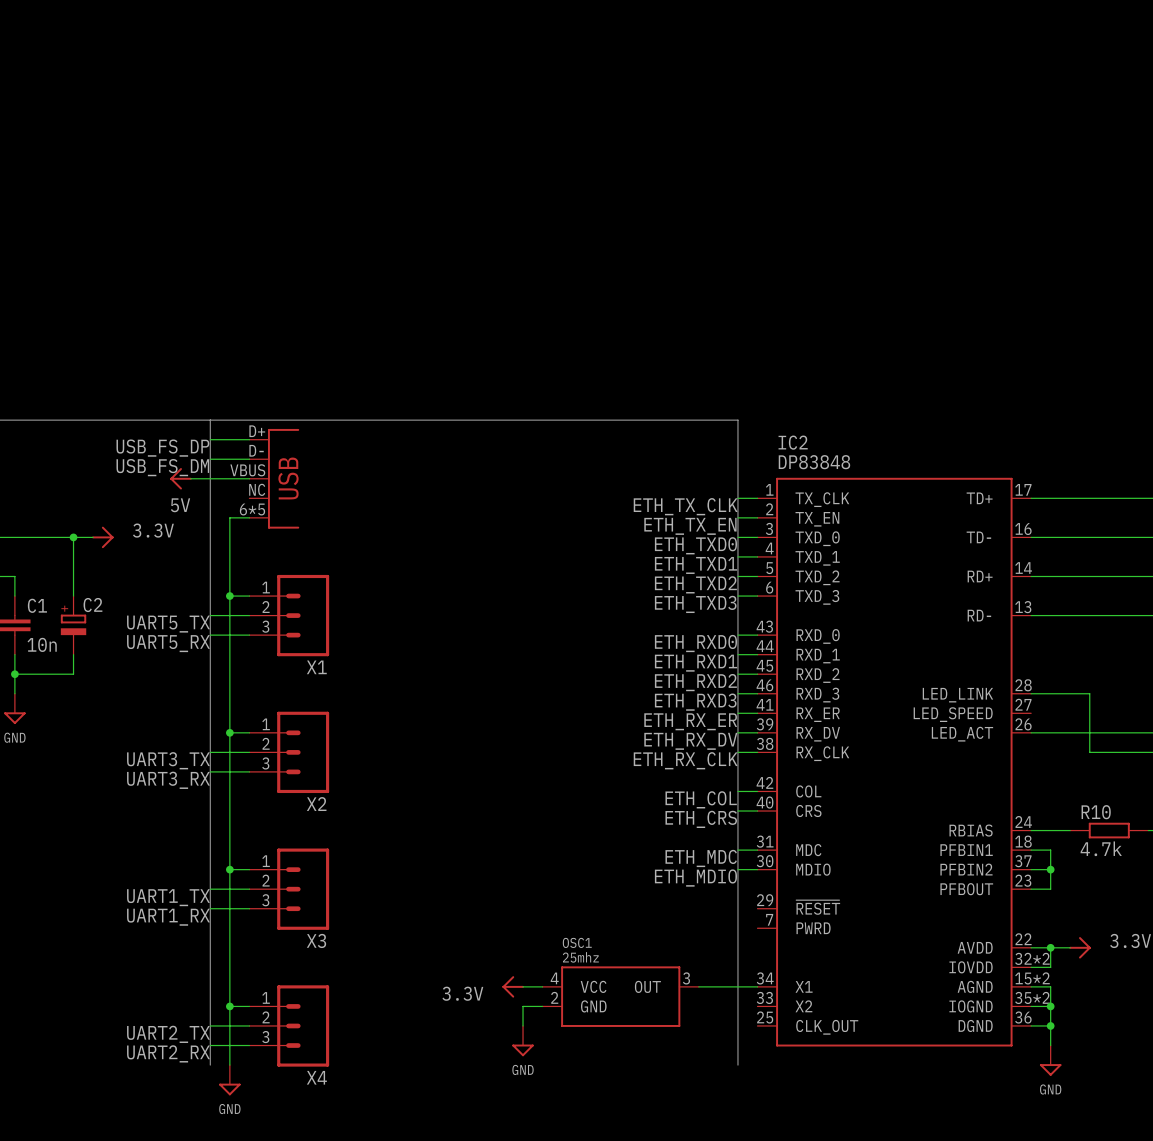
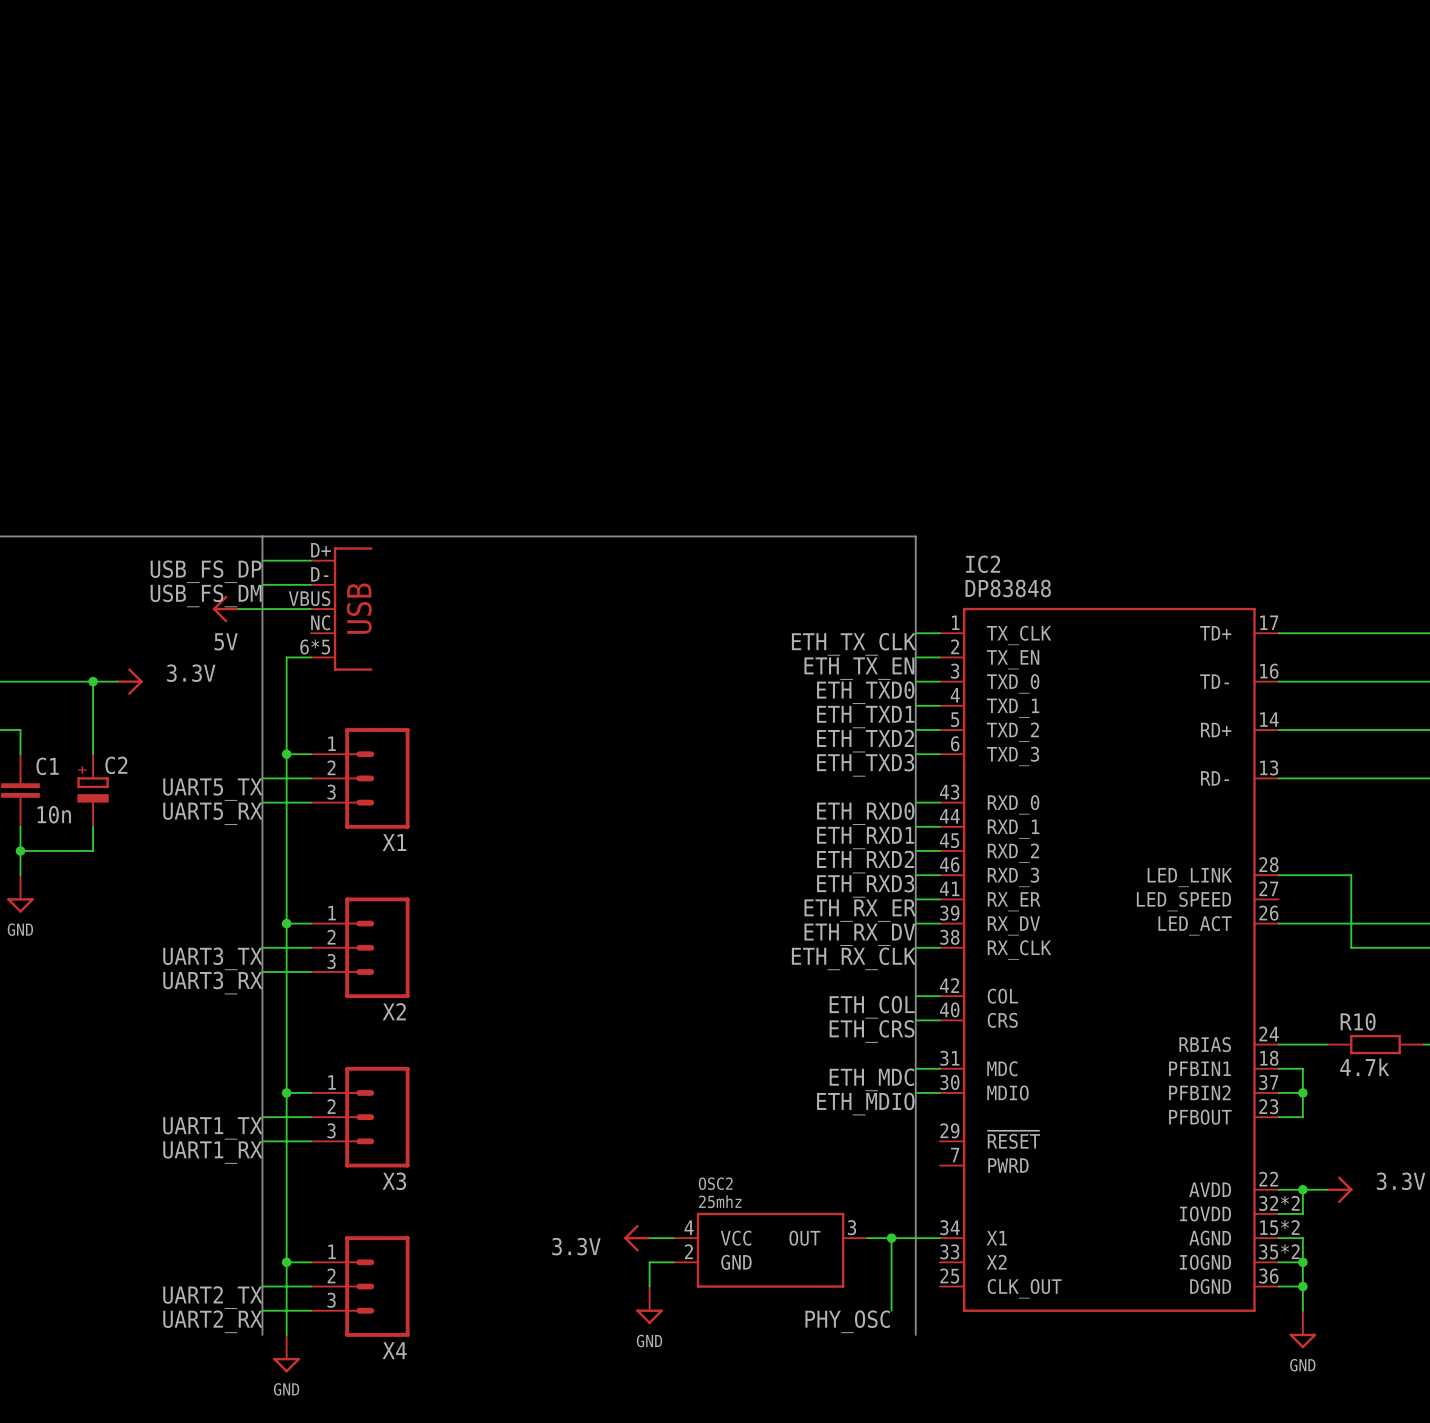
OSC1 name: OSC1 (577, 942) -> OSC2 (715, 1183)
wire: none -> (891, 1238) (891, 1310)
junction: none -> (891, 1238)
label: none -> PHY_OSC (847, 1321)

